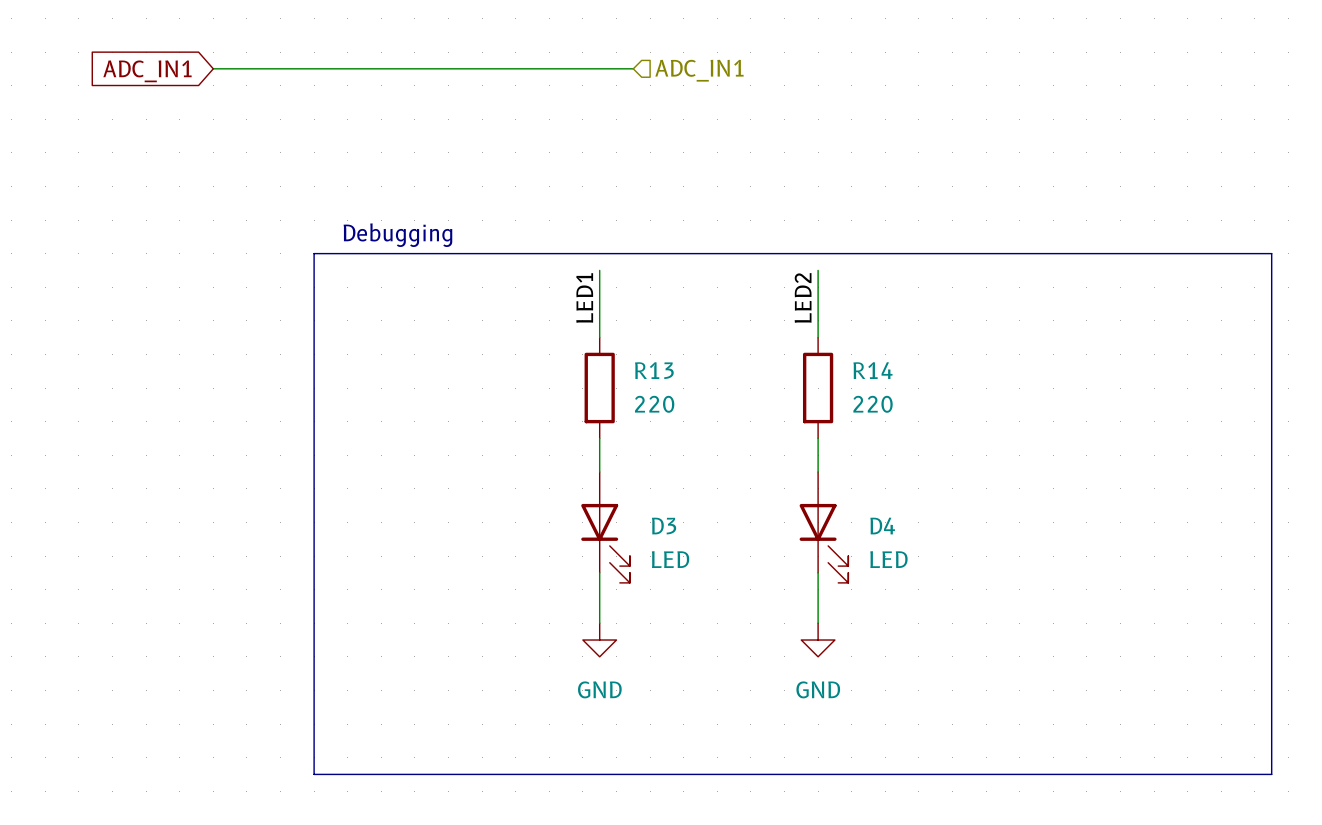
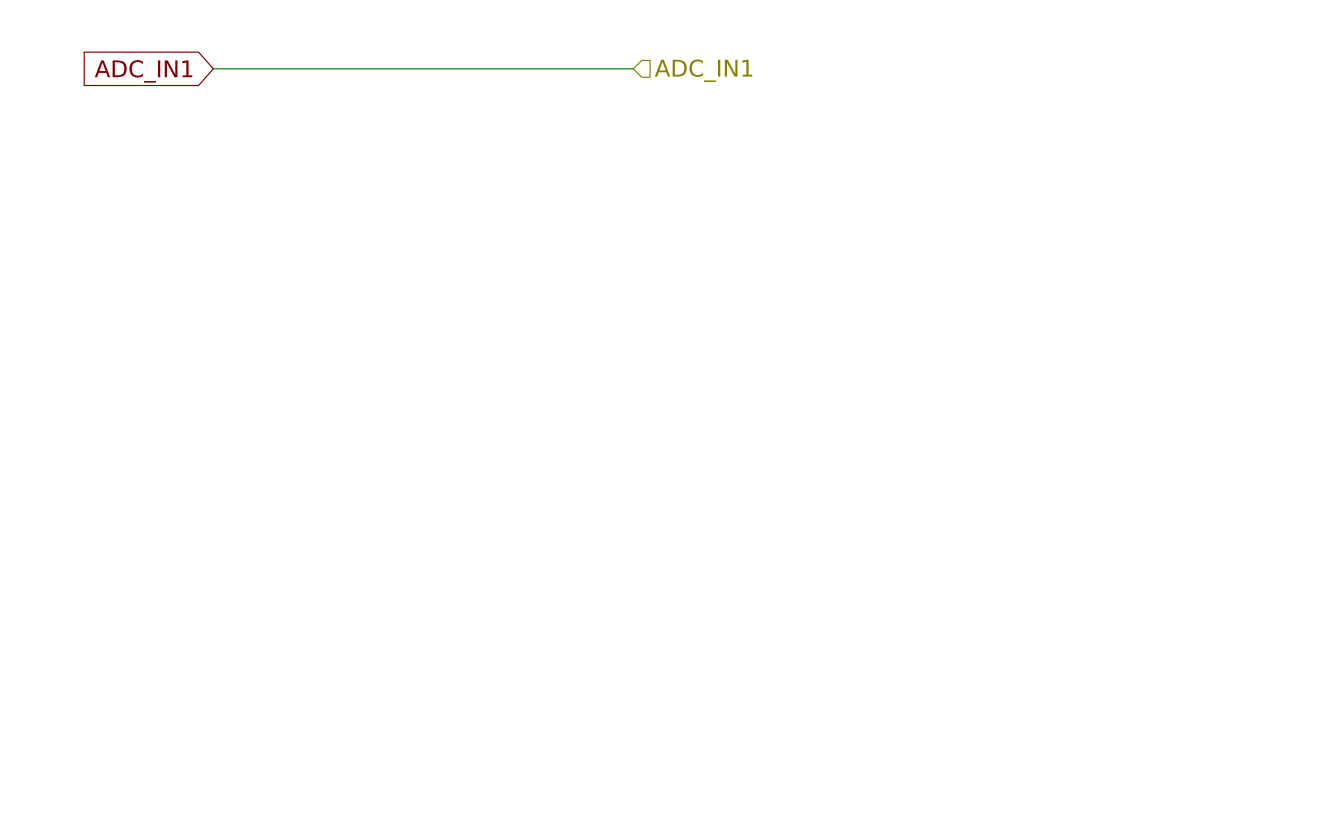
text: Debugging (397, 235) -> none
line: (314, 253) (1271, 253) (1271, 774) (314, 774) (314, 253) -> none
wire: (599, 270) (599, 337) -> none
wire: (818, 270) (818, 337) -> none
label: LED1 (584, 297) -> none
label: LED2 (803, 297) -> none
R13: 220 (599, 388) -> none
R14: 220 (818, 388) -> none
wire: (599, 438) (599, 472) -> none
wire: (818, 438) (818, 472) -> none
D3: LED (605, 527) -> none
D4: LED (823, 527) -> none
wire: (599, 572) (599, 623) -> none
wire: (818, 572) (818, 623) -> none
power symbol: GND (599, 640) -> none
power symbol: GND (818, 640) -> none

